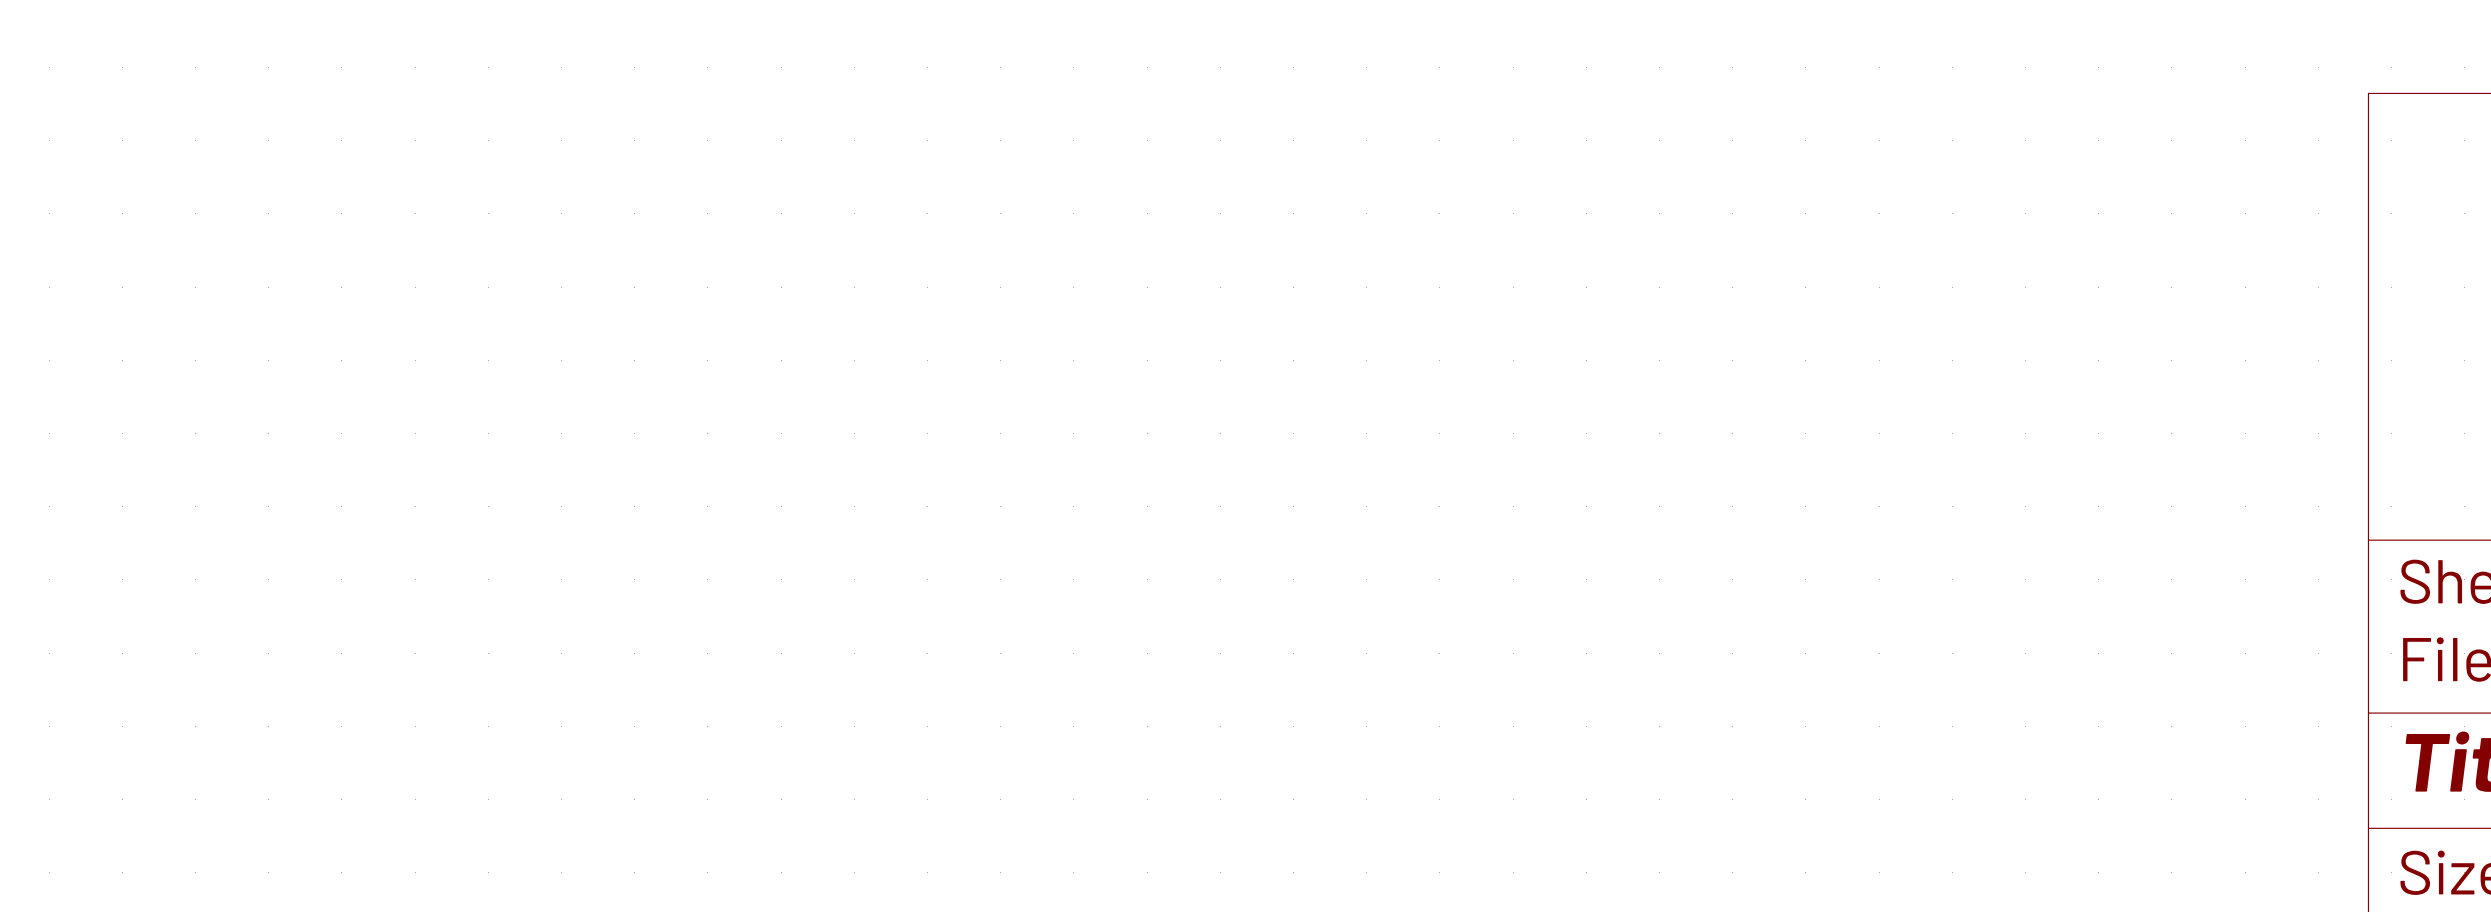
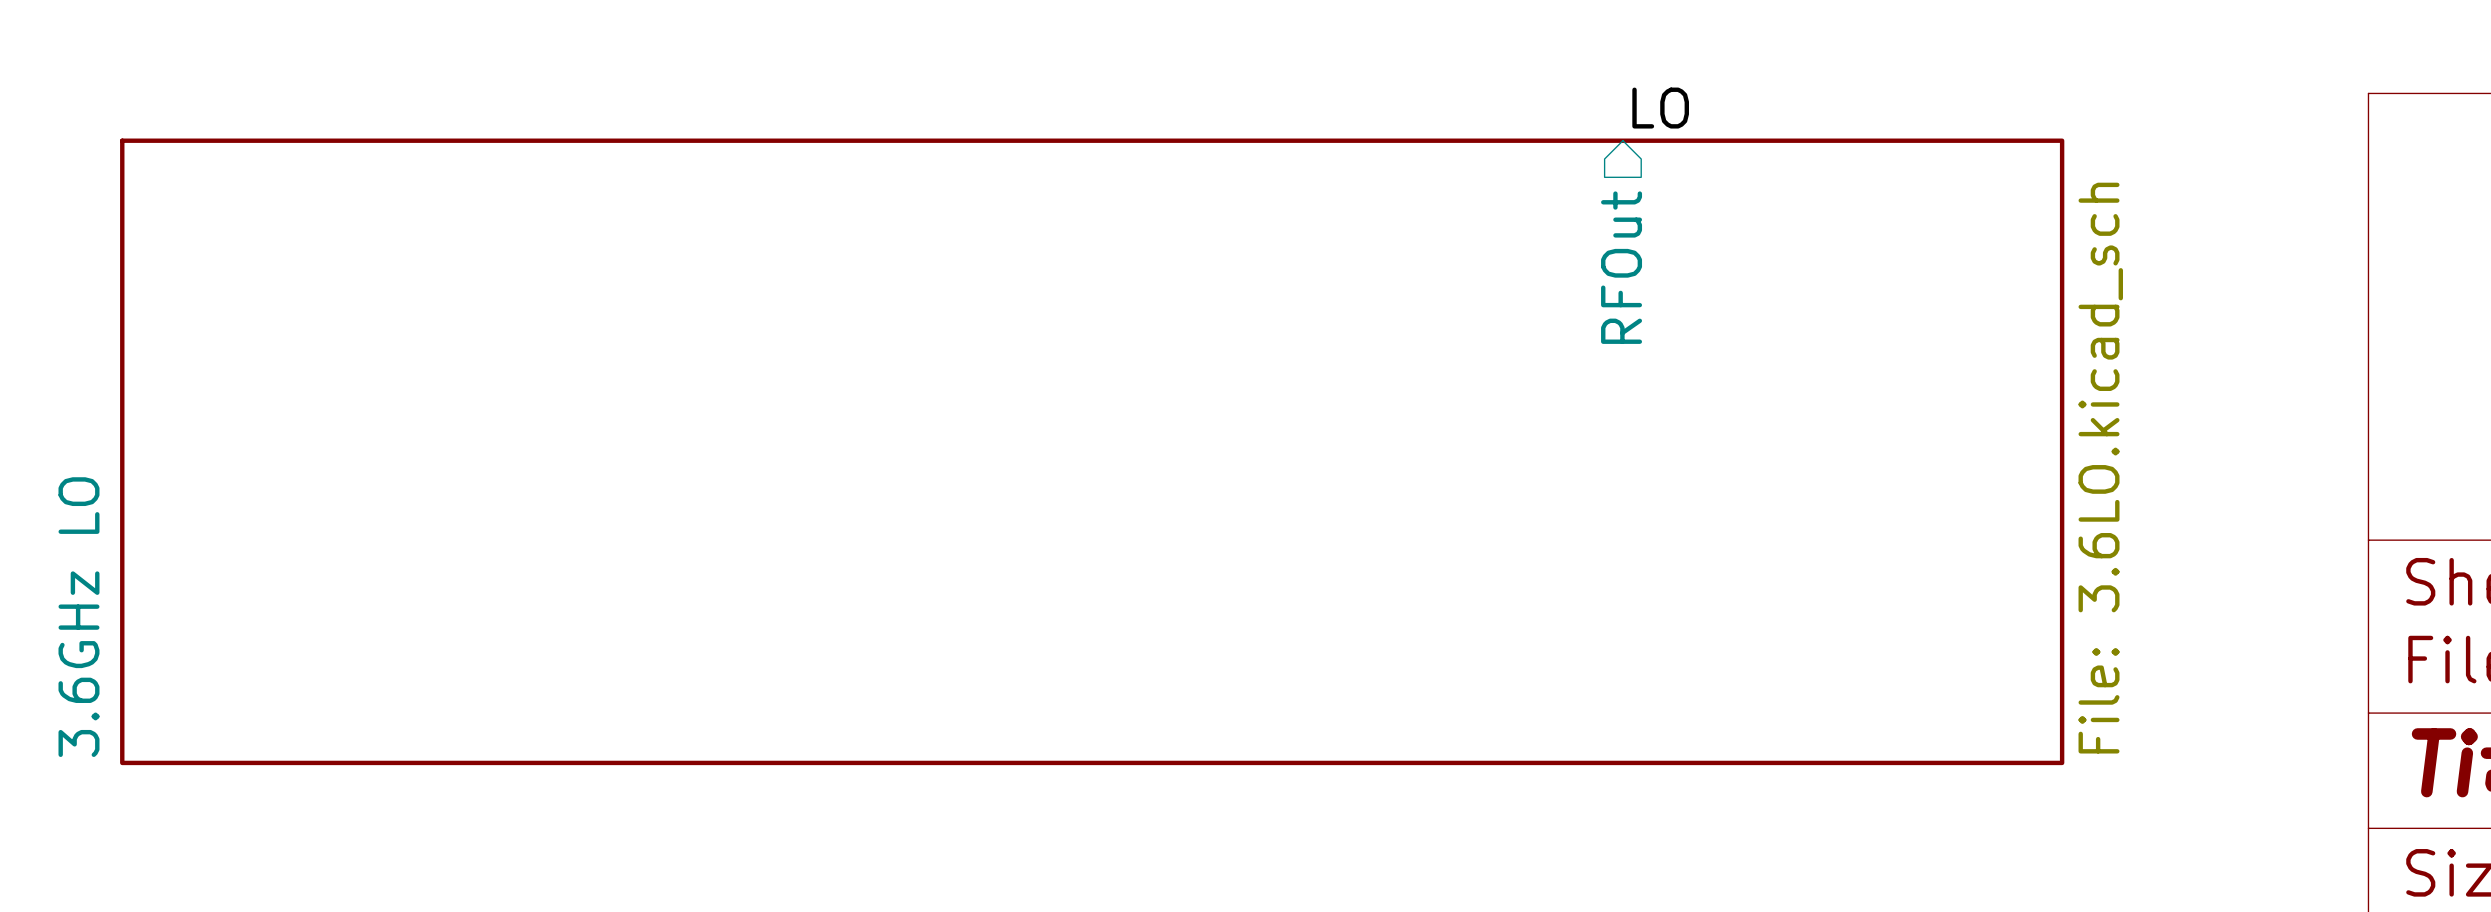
label: none -> LO (1660, 108)
sheet pin: none -> RFOut (1621, 267)
sheet 3.6GHz LO: none -> File: 3.6LO.kicad_sch (1092, 451)

